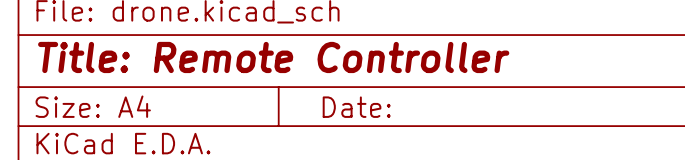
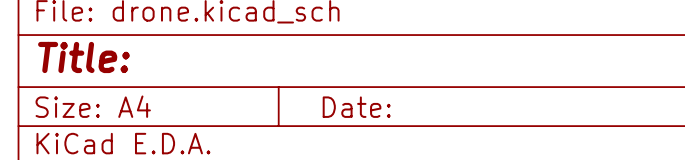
title block: Title: Remote Controller (273, 57) -> Title: (83, 57)

